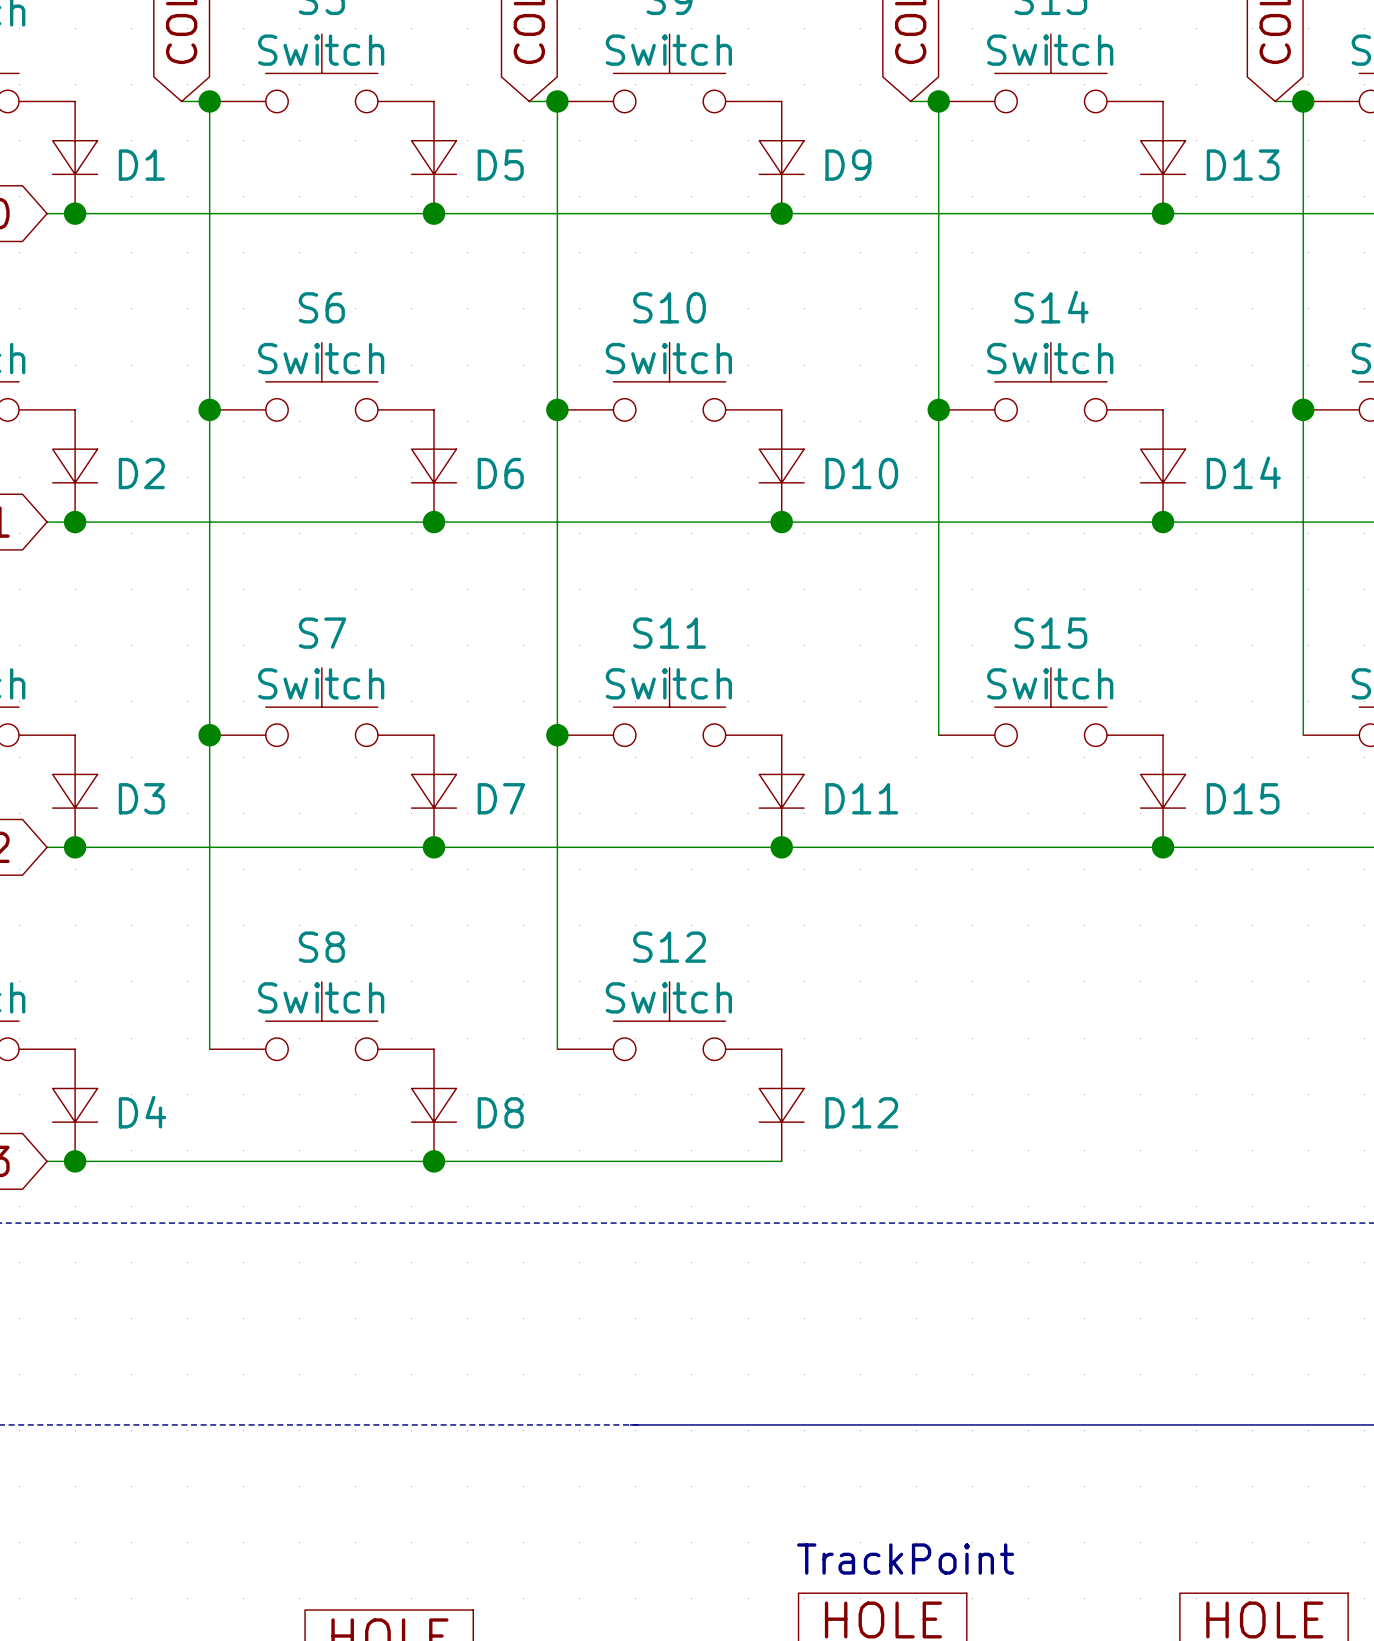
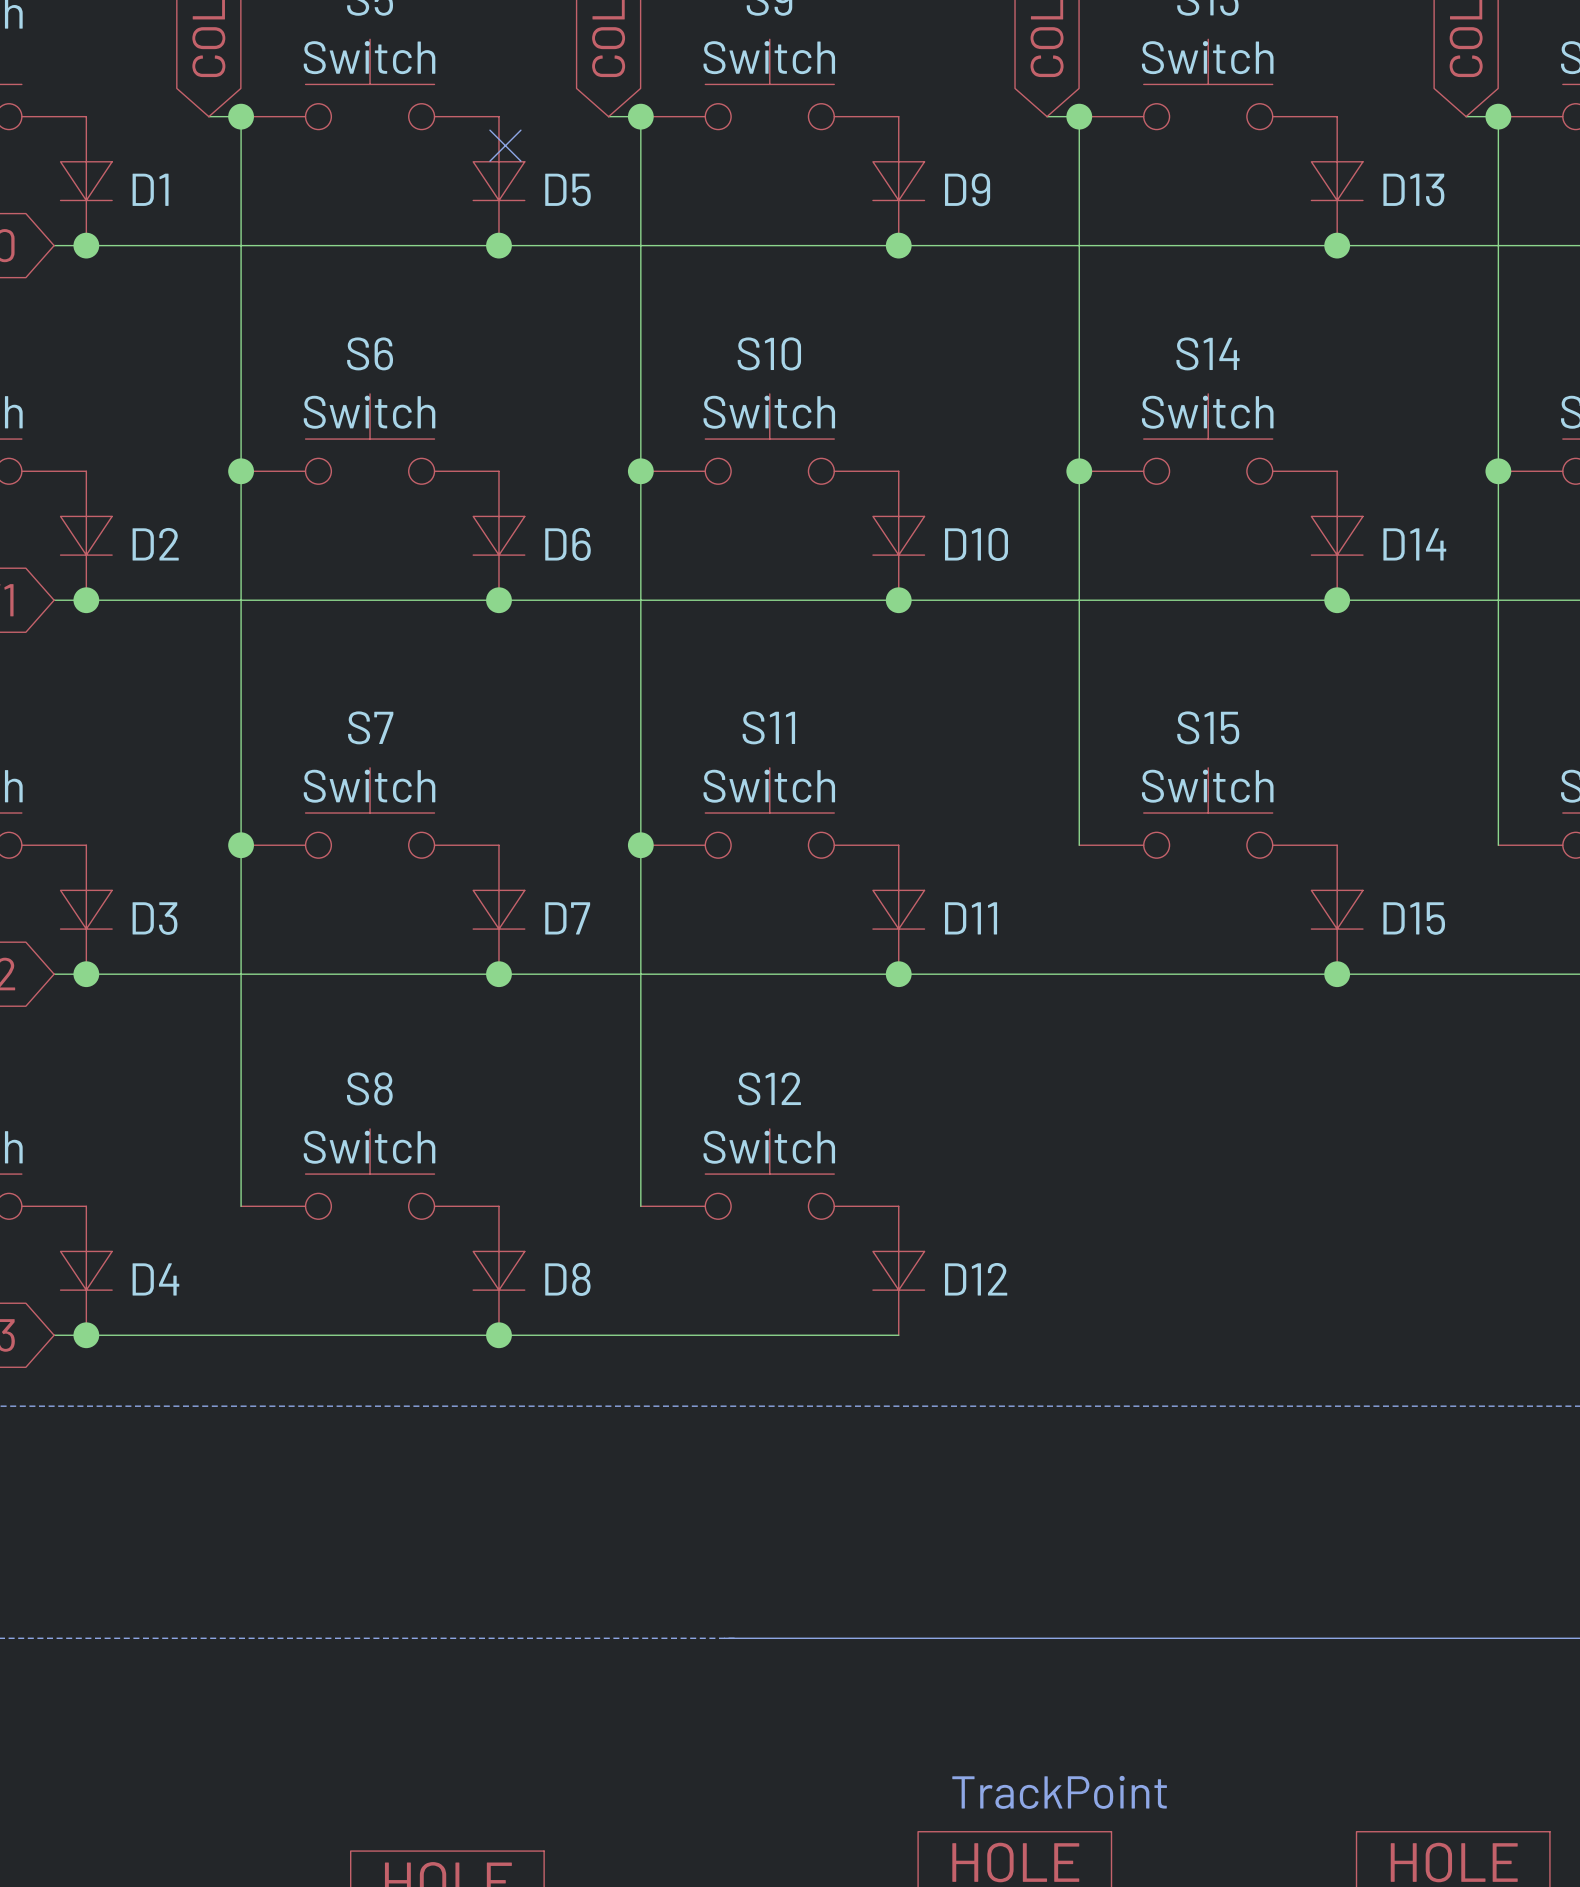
no-connect mark: none -> (505, 145)

